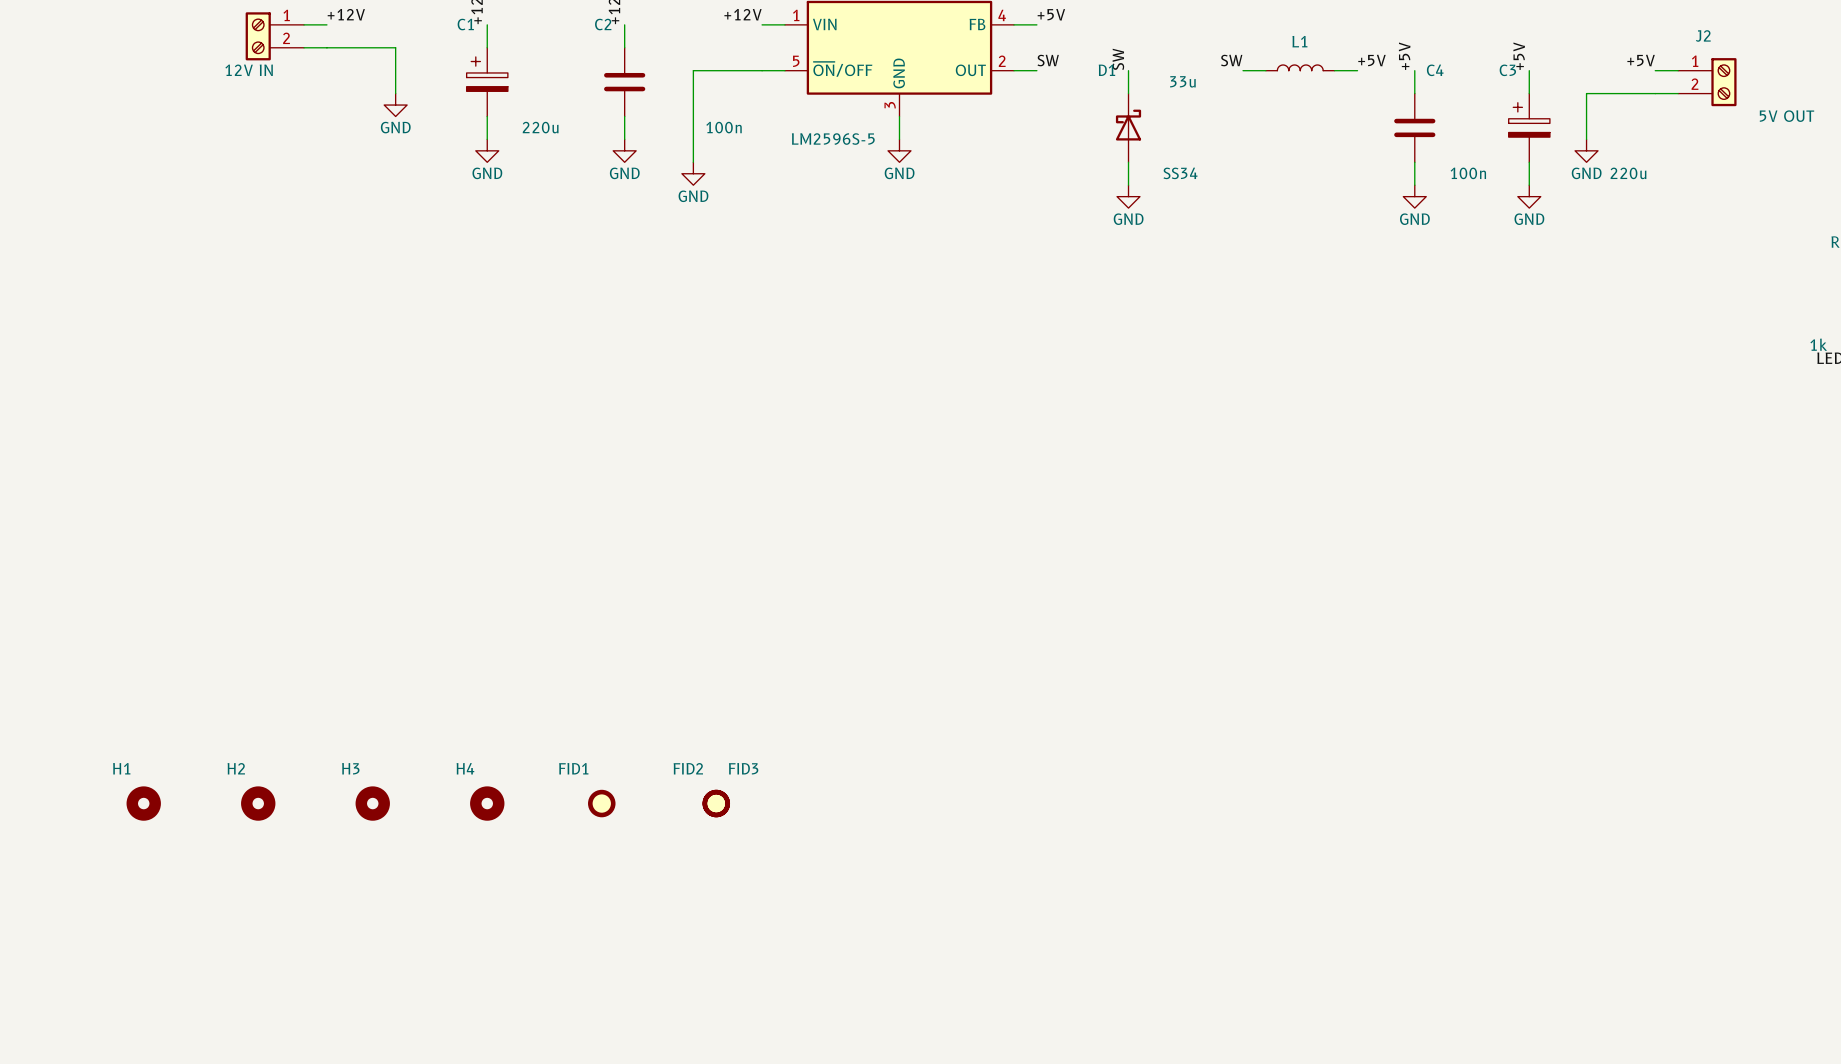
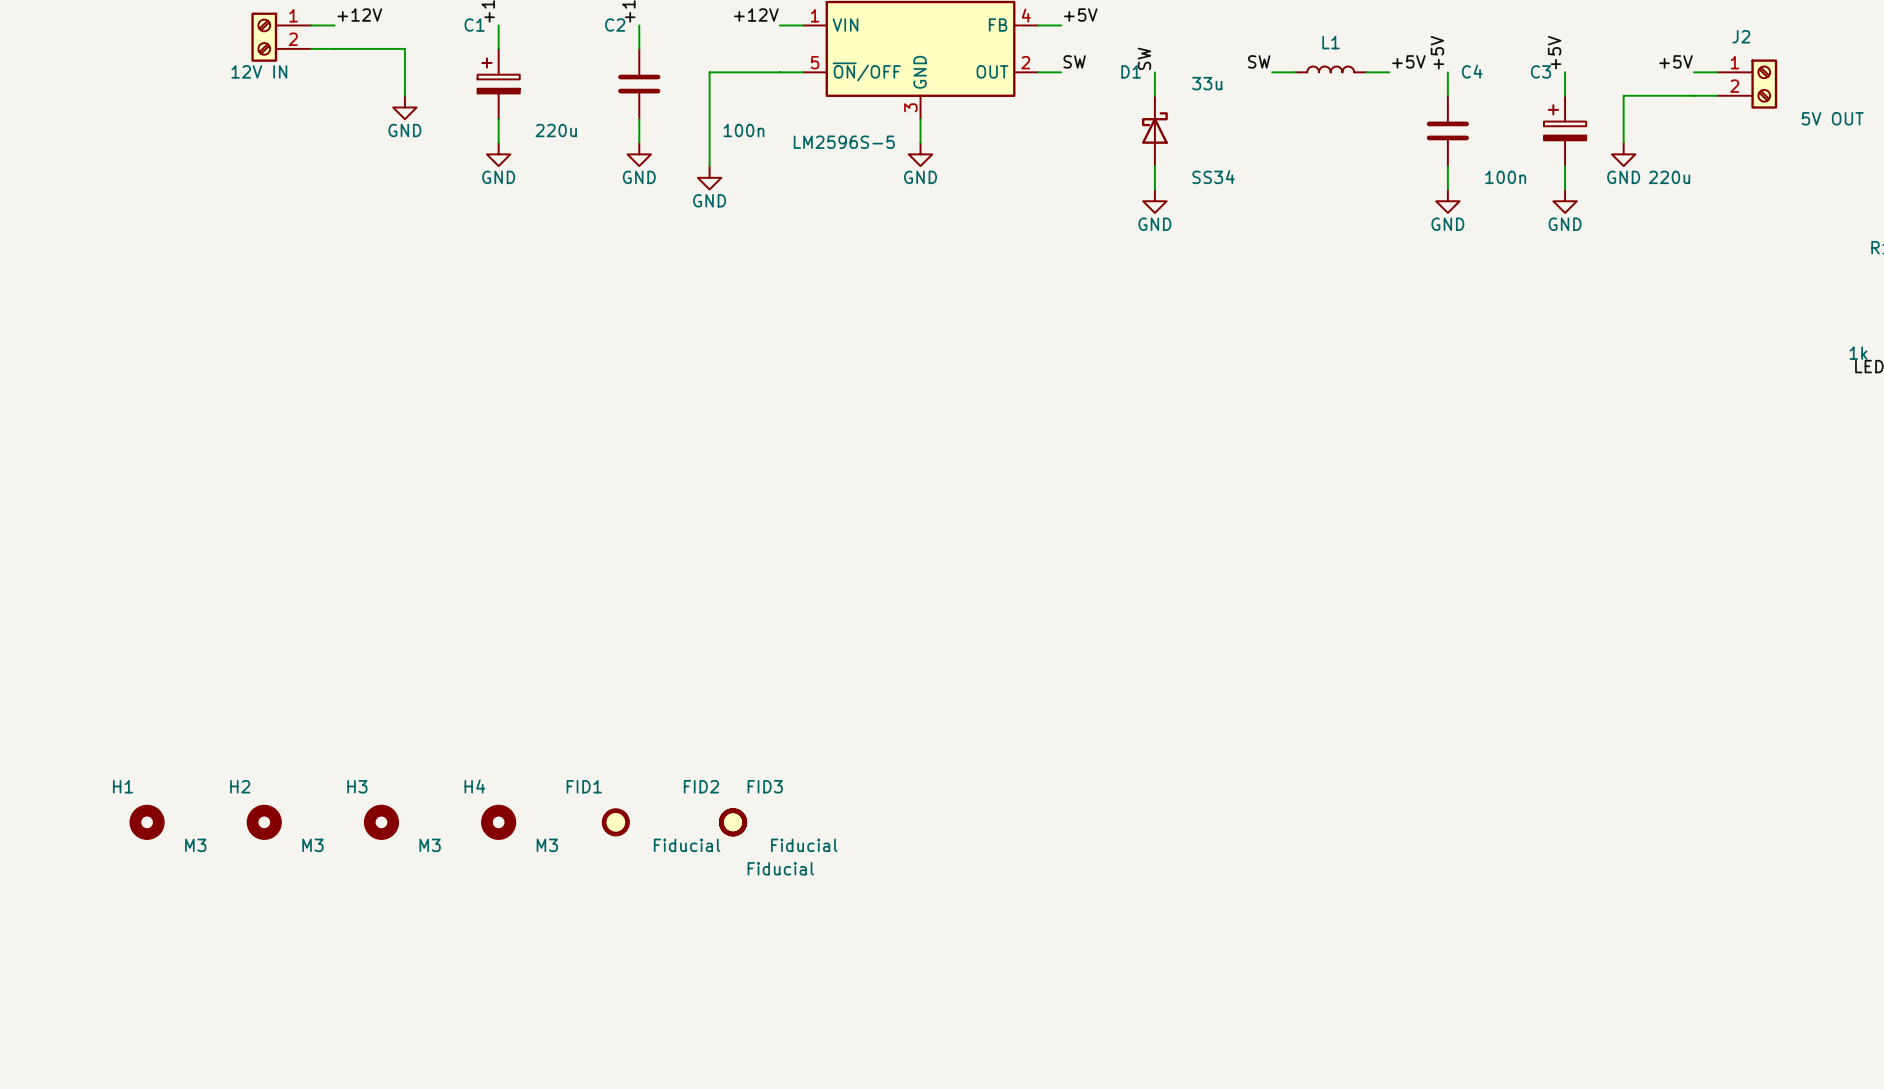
FID1 value: none -> Fiducial (687, 845)
FID2 value: none -> Fiducial (804, 845)
H1 value: none -> M3 (195, 845)
H2 value: none -> M3 (312, 845)
H3 value: none -> M3 (430, 845)
H4 value: none -> M3 (547, 845)
FID3 value: none -> Fiducial (780, 868)

